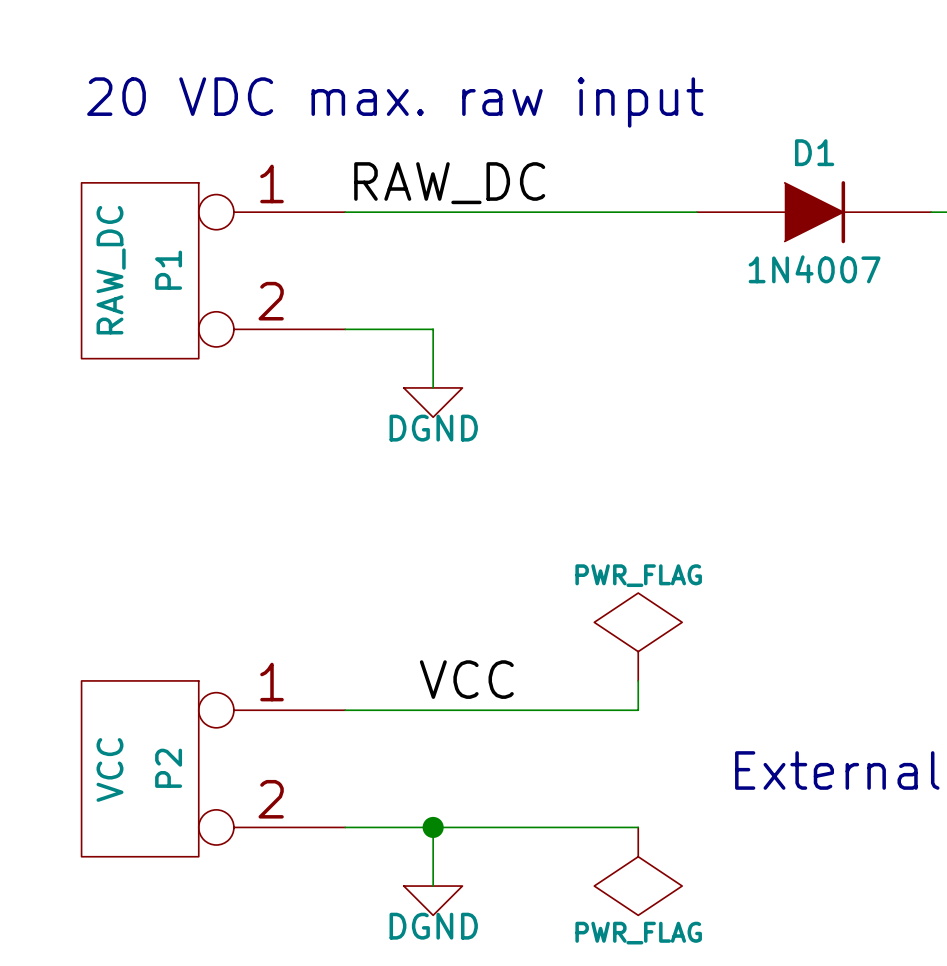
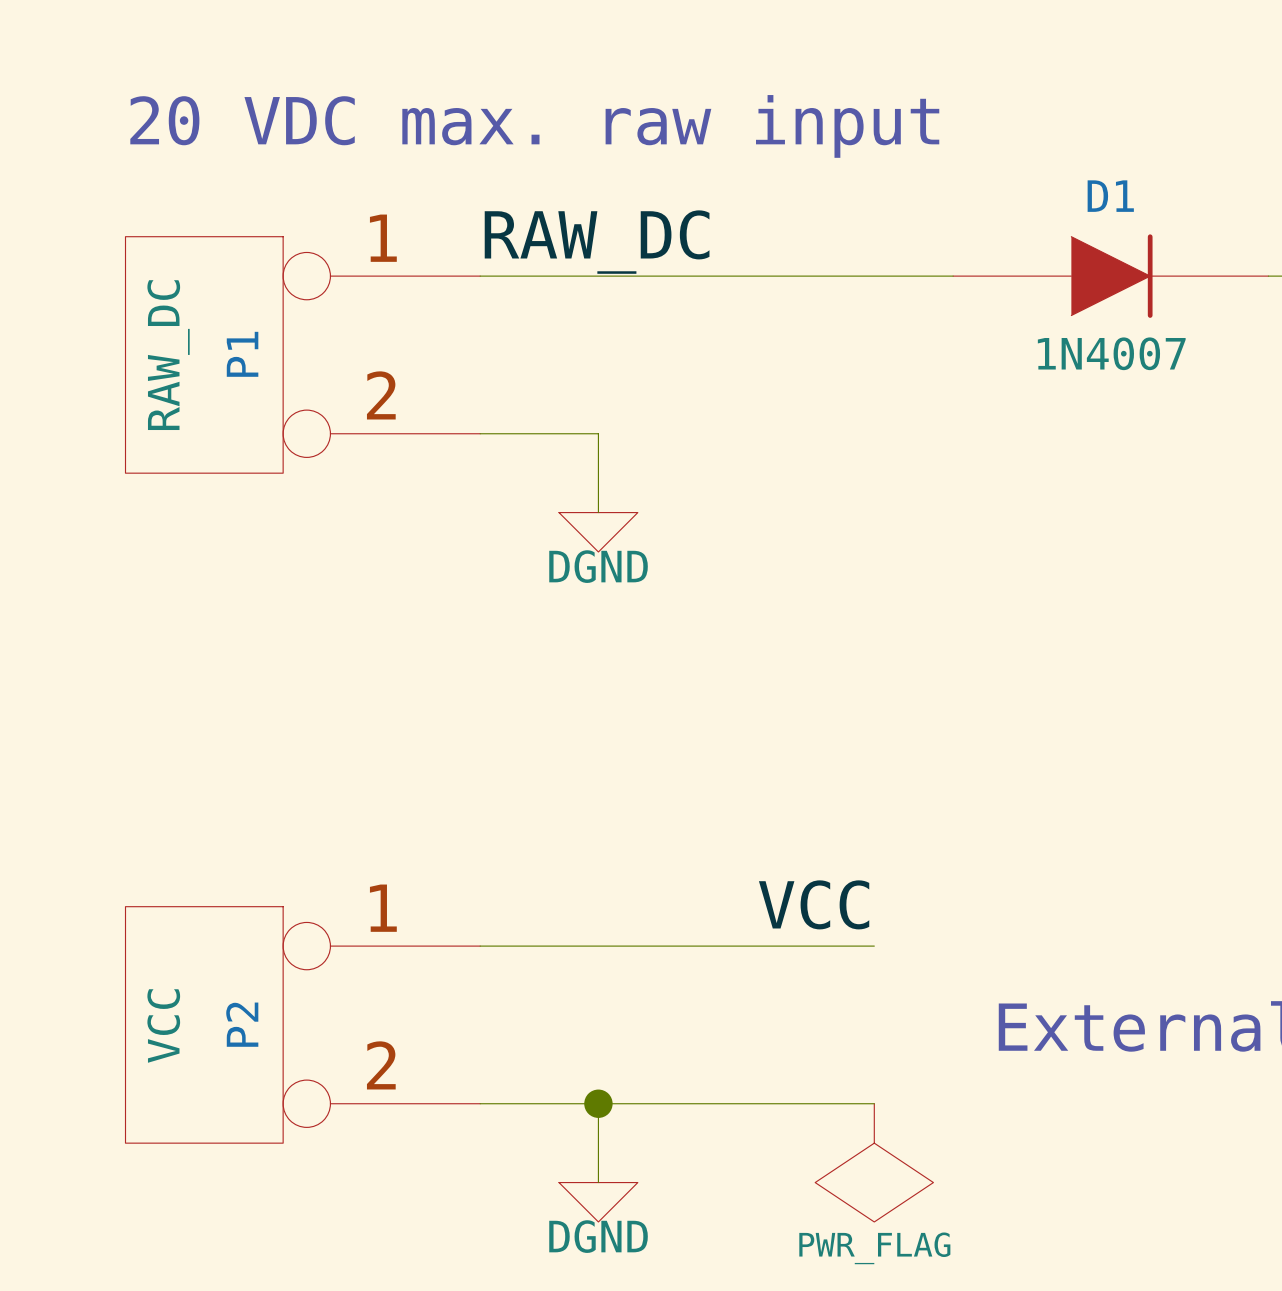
power symbol: PWR_FLAG (638, 636) -> none
label position: VCC (466, 679) -> VCC (814, 904)
wire: (638, 680) (638, 710) -> none

